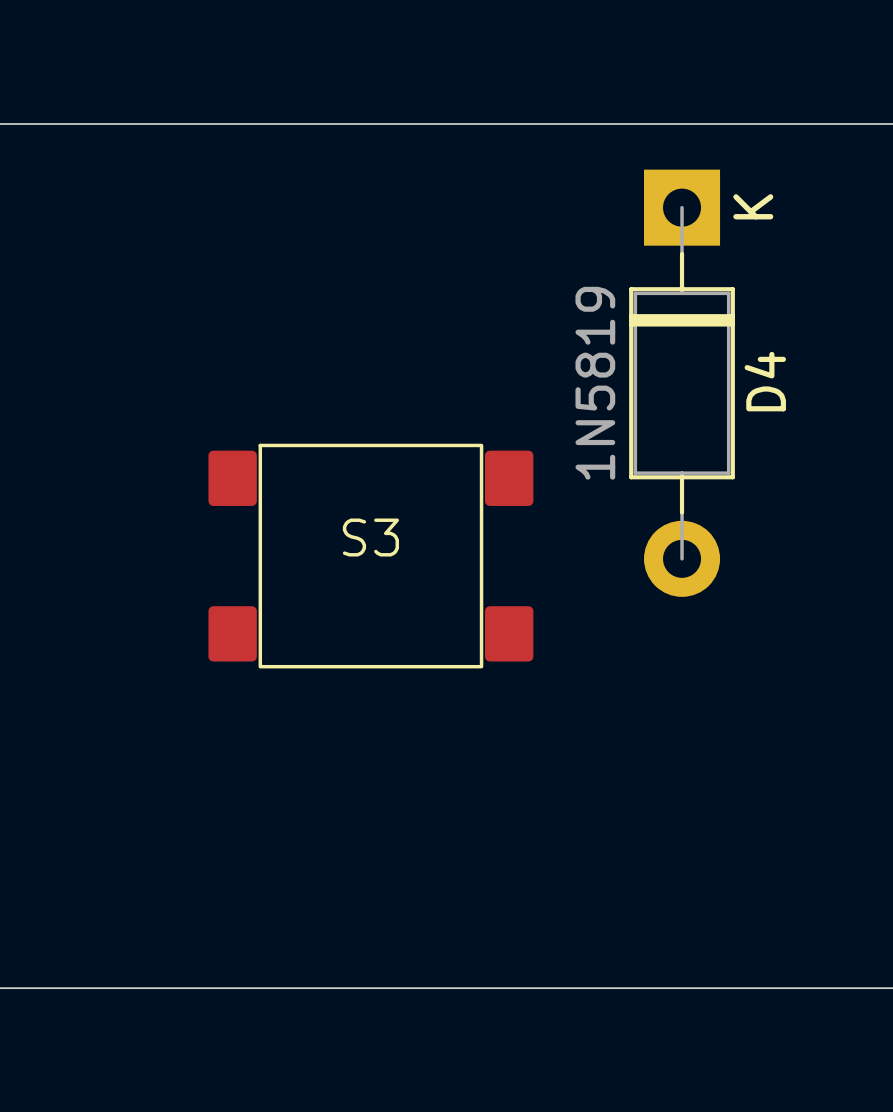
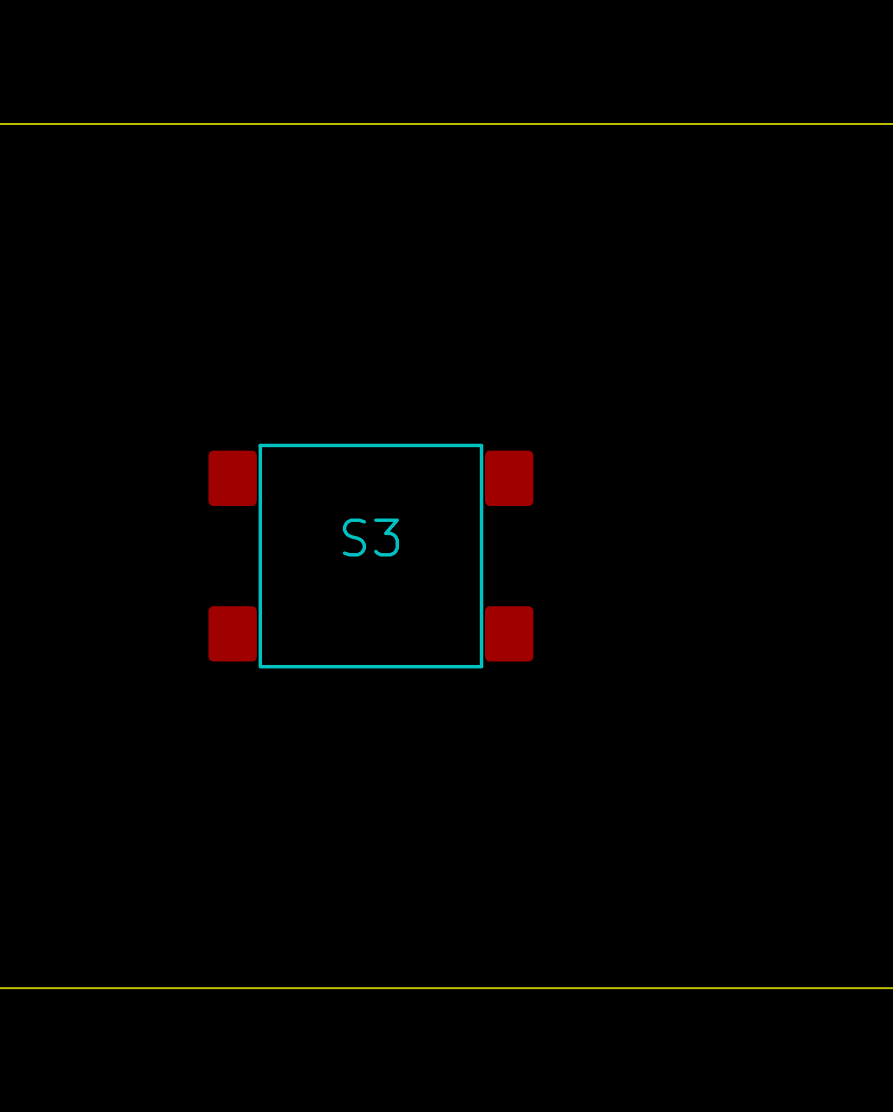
D4: 1N5819 (682, 383) -> none

